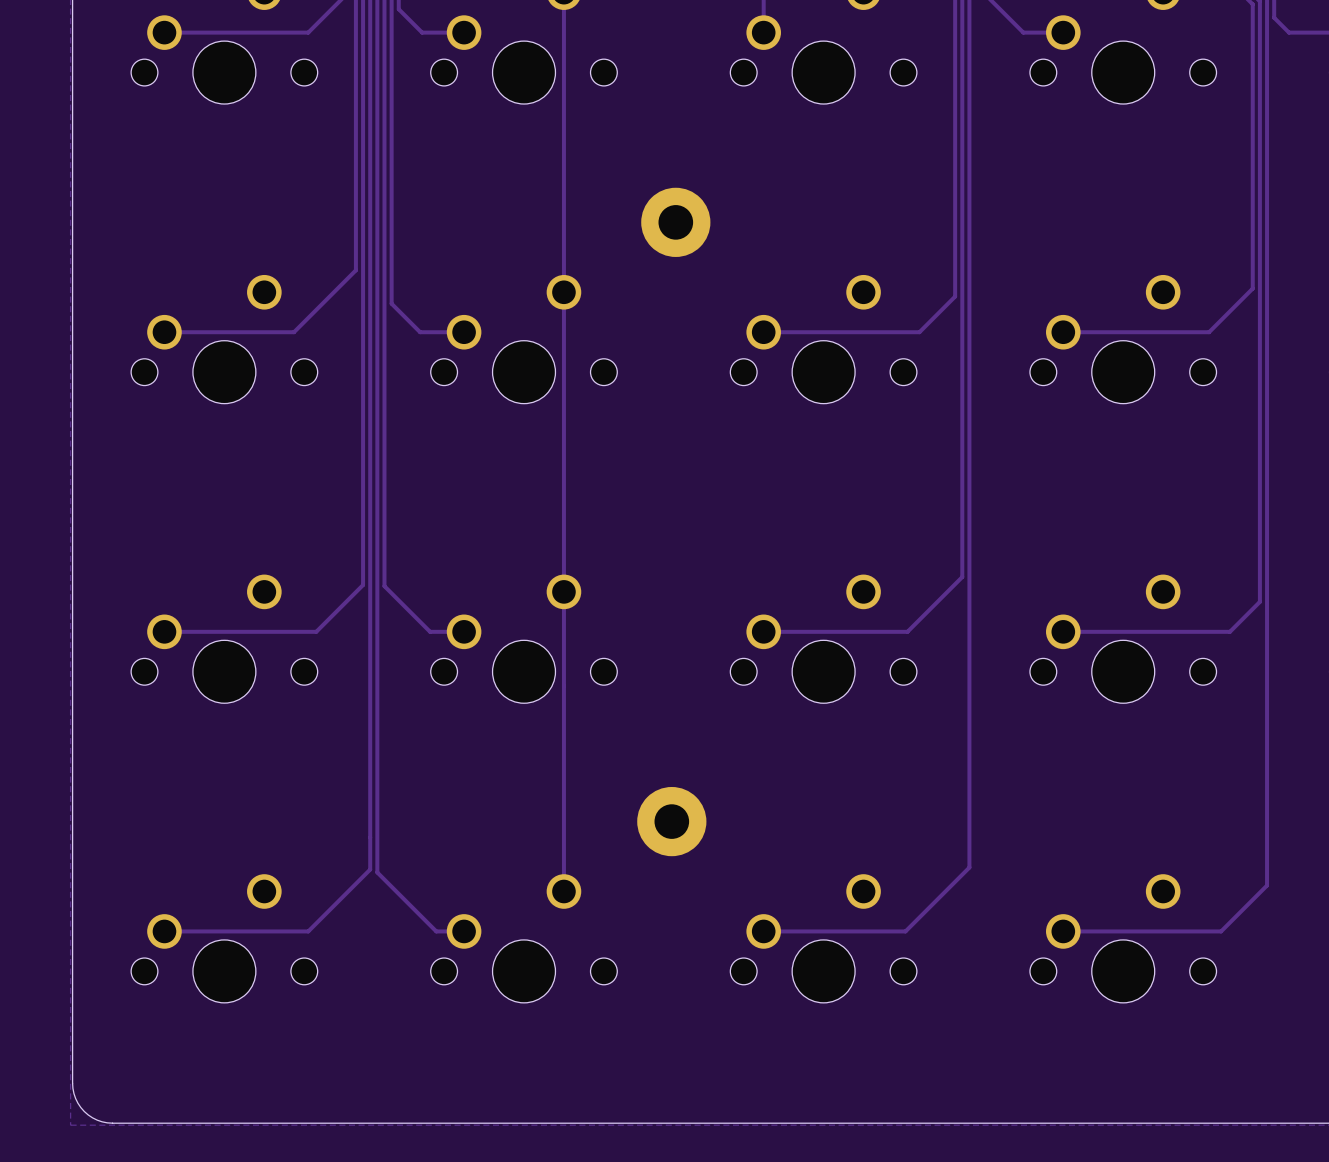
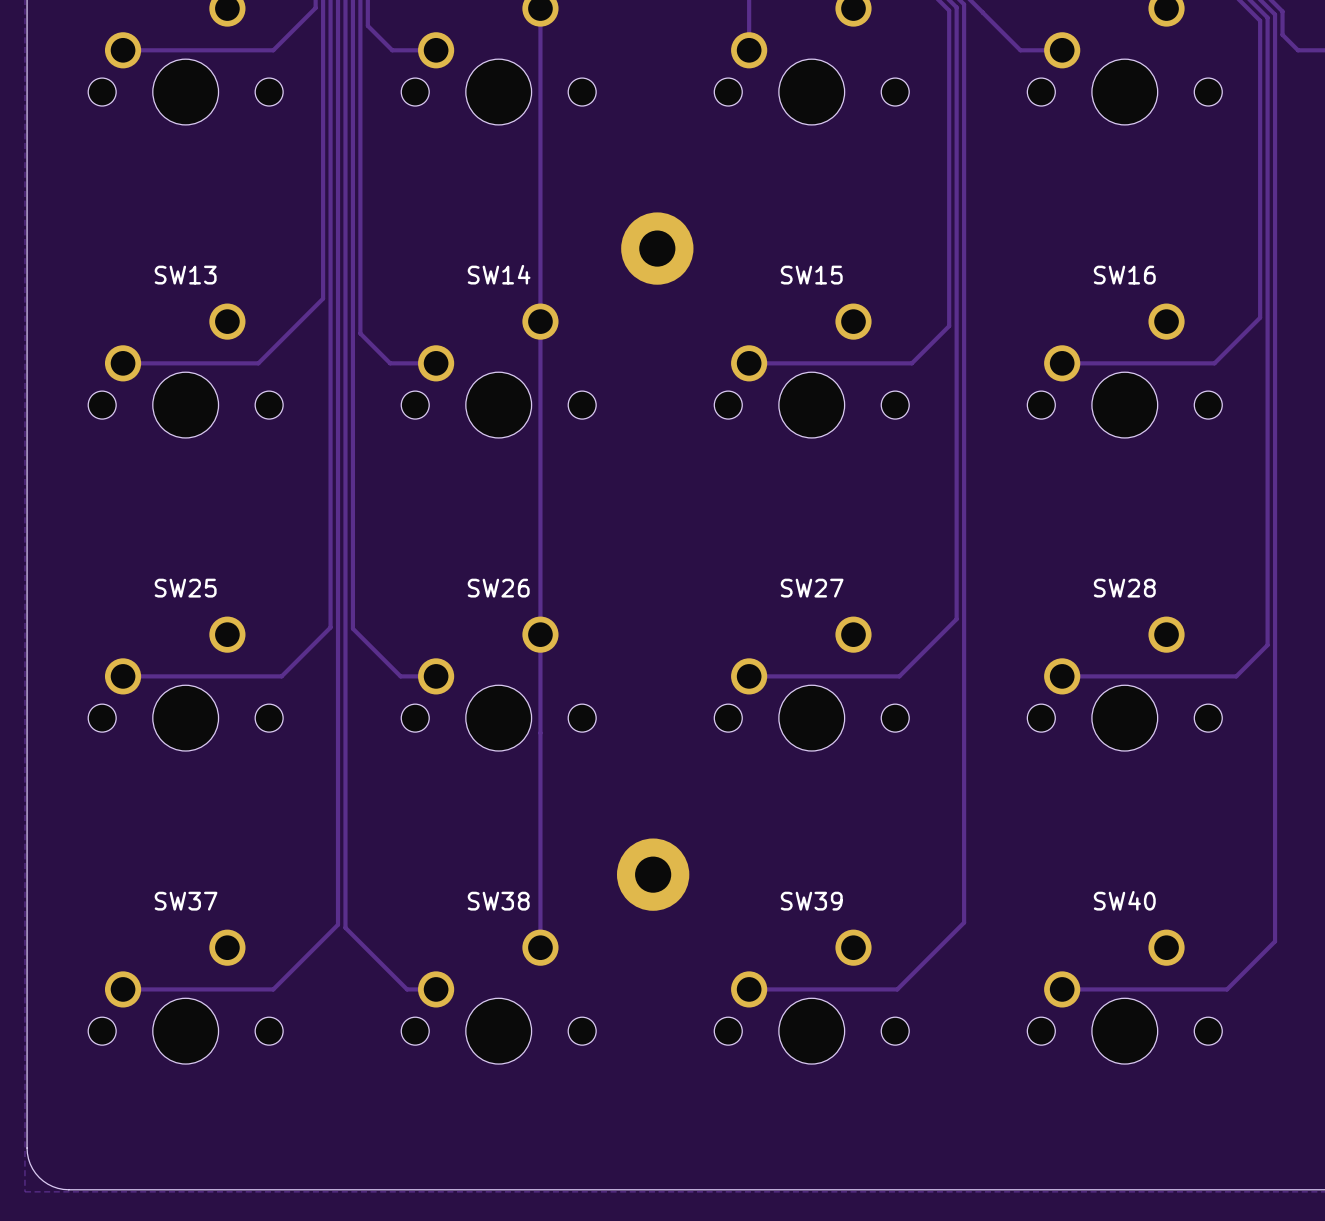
SW13 name: none -> SW13 (185, 275)
SW14 name: none -> SW14 (499, 274)
SW15 name: none -> SW15 (811, 275)
SW16 name: none -> SW16 (1124, 275)
SW25 name: none -> SW25 (185, 588)
SW26 name: none -> SW26 (498, 588)
SW27 name: none -> SW27 (812, 588)
SW28 name: none -> SW28 (1124, 588)
SW37 name: none -> SW37 (186, 901)
SW38 name: none -> SW38 (498, 901)
SW39 name: none -> SW39 (811, 901)
SW40 name: none -> SW40 (1124, 900)

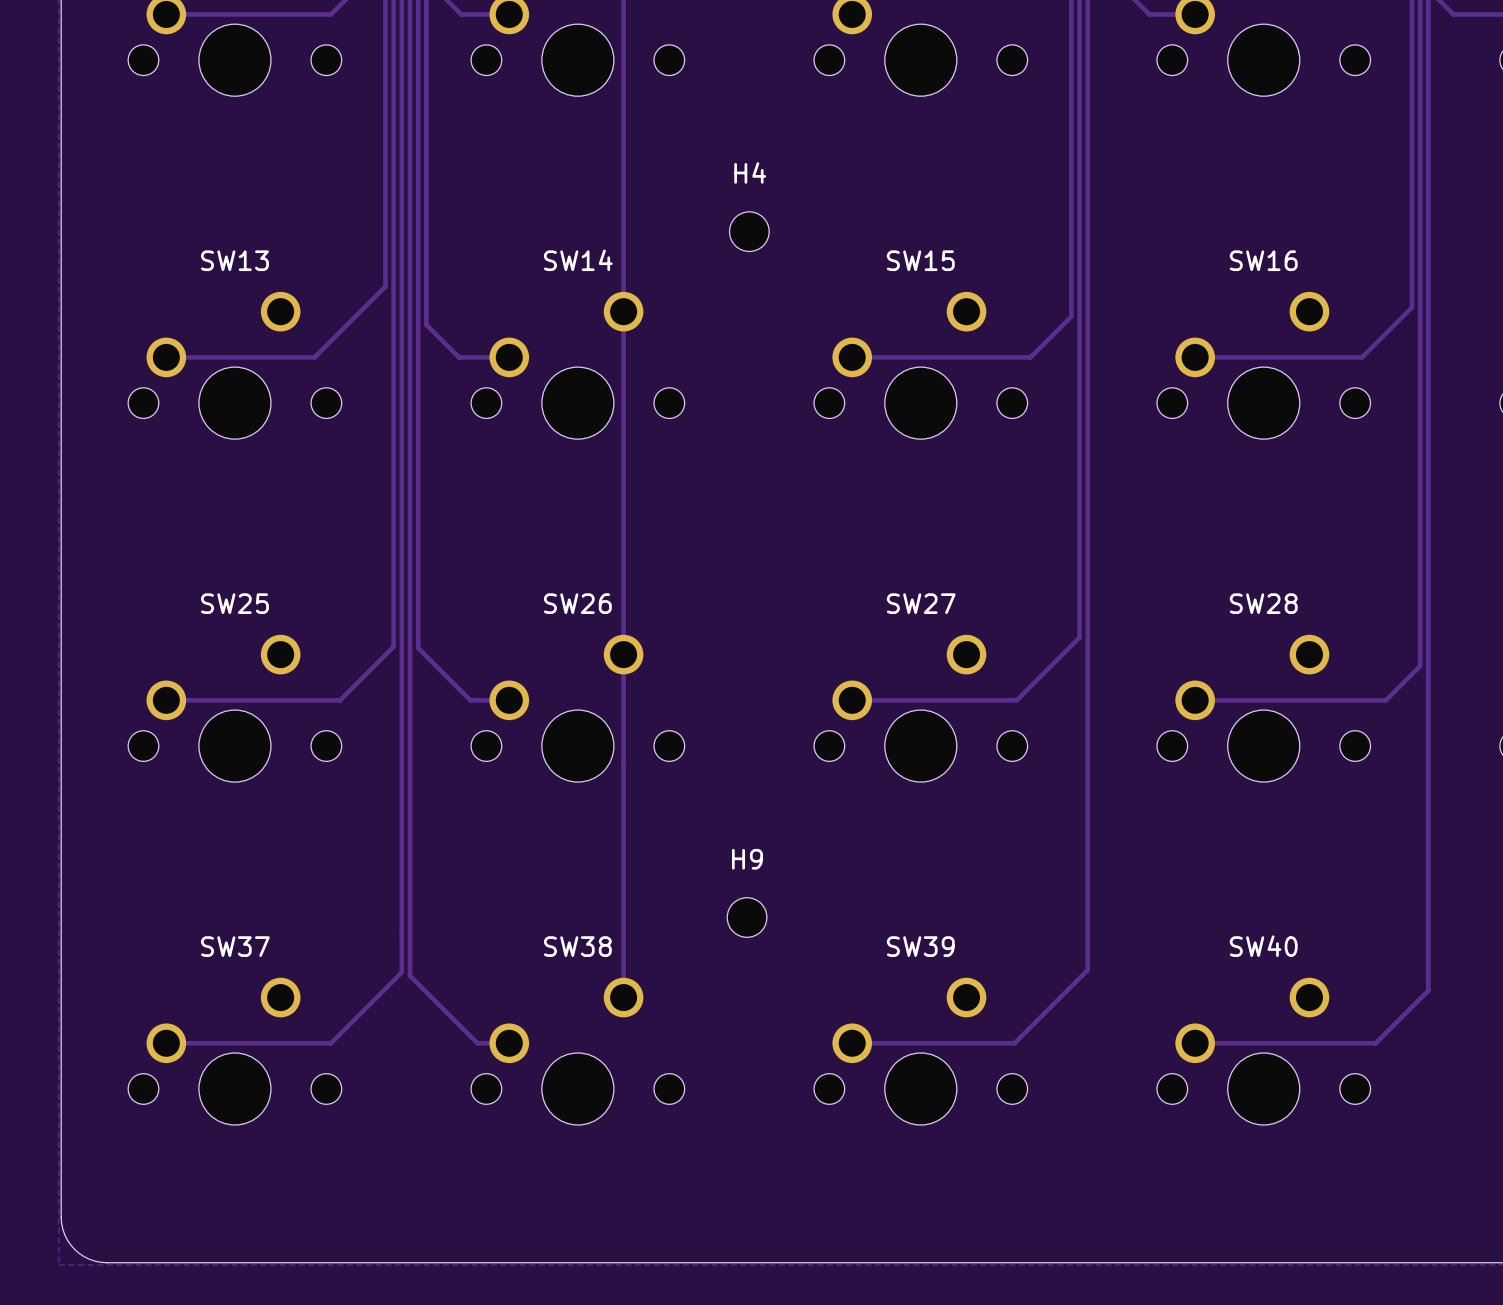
H4: none -> (749, 231)
part: (657, 248) -> none
part: (653, 874) -> none
H9: none -> (747, 917)

